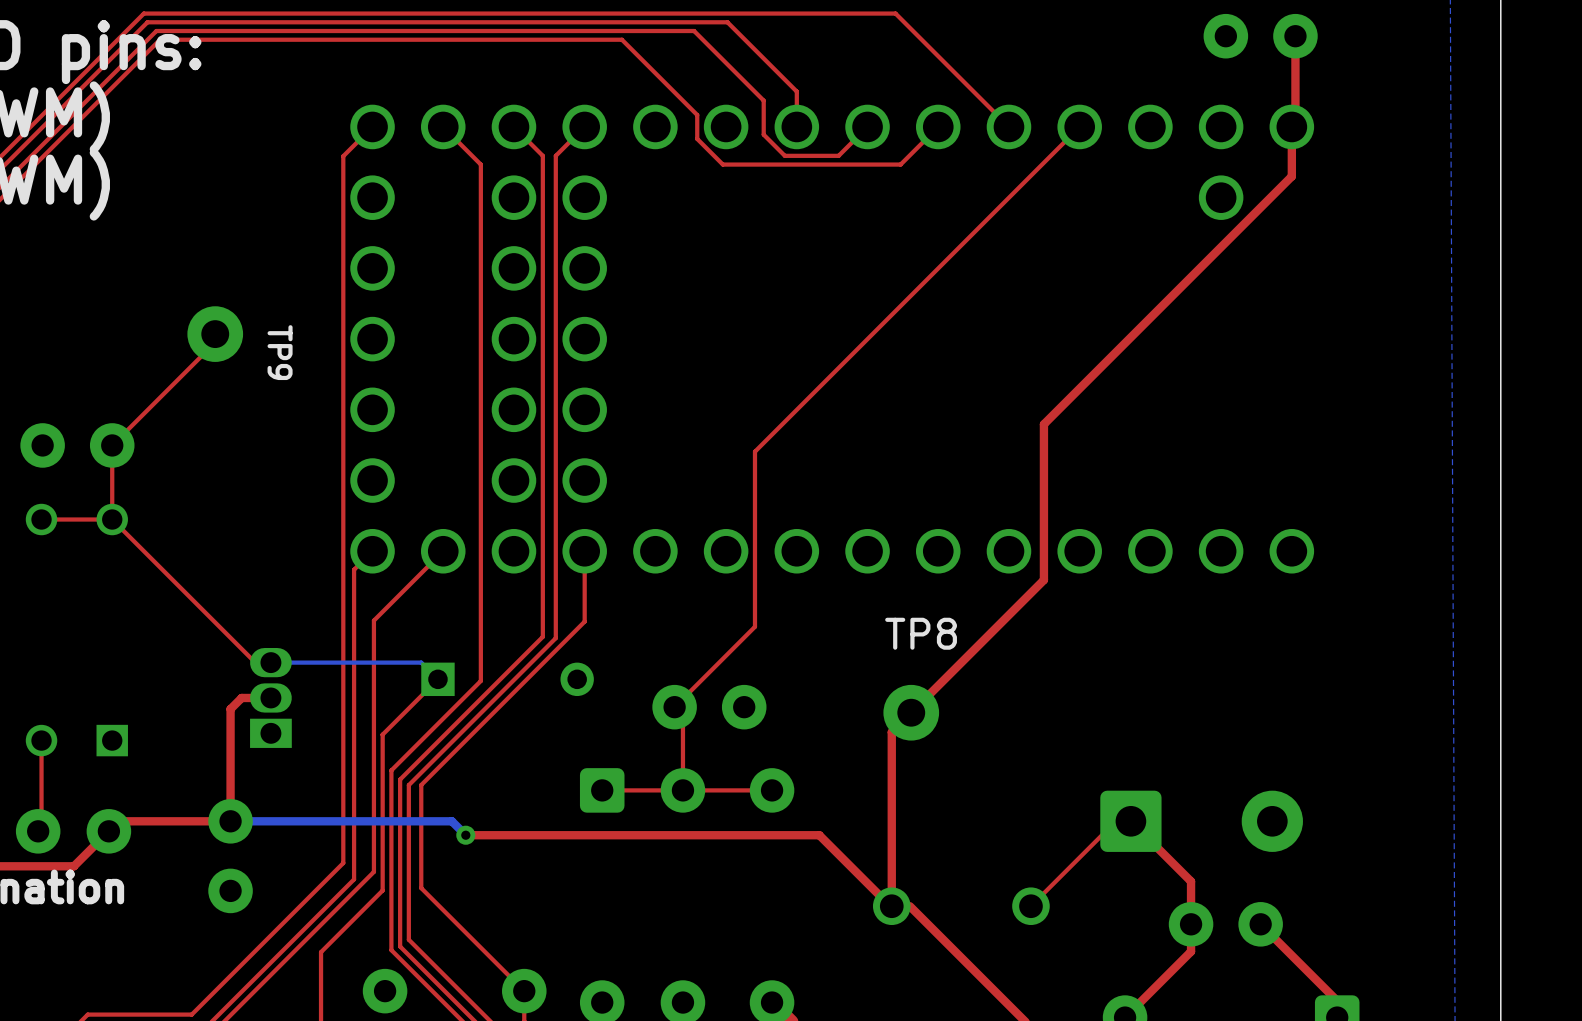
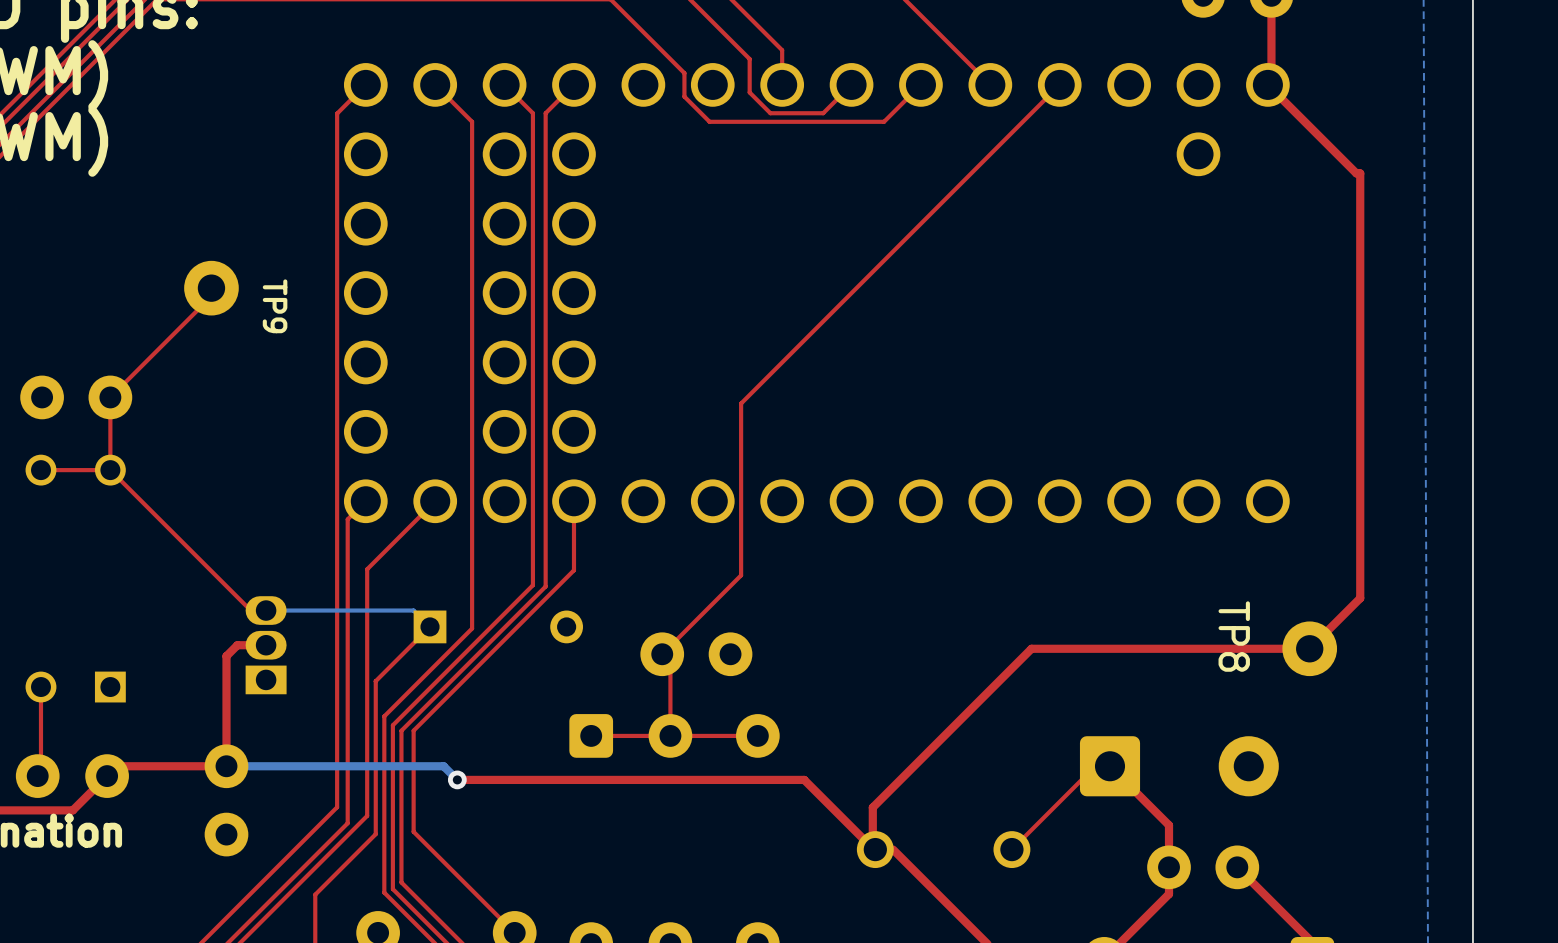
top track: (1291, 126) (1291, 176) (1043, 424) (1043, 580) (891, 732) (891, 906) -> (1267, 84) (1356, 173) (1360, 173) (1360, 598) (1309, 648) (1031, 648) (872, 807) (872, 848)
TP8 name rotation: 0° (921, 633) -> 90° clockwise (1234, 636)
TP8 name position: TP8 (921, 633) -> TP8 (1234, 636)
TP8 position: (911, 712) -> (1309, 648)

